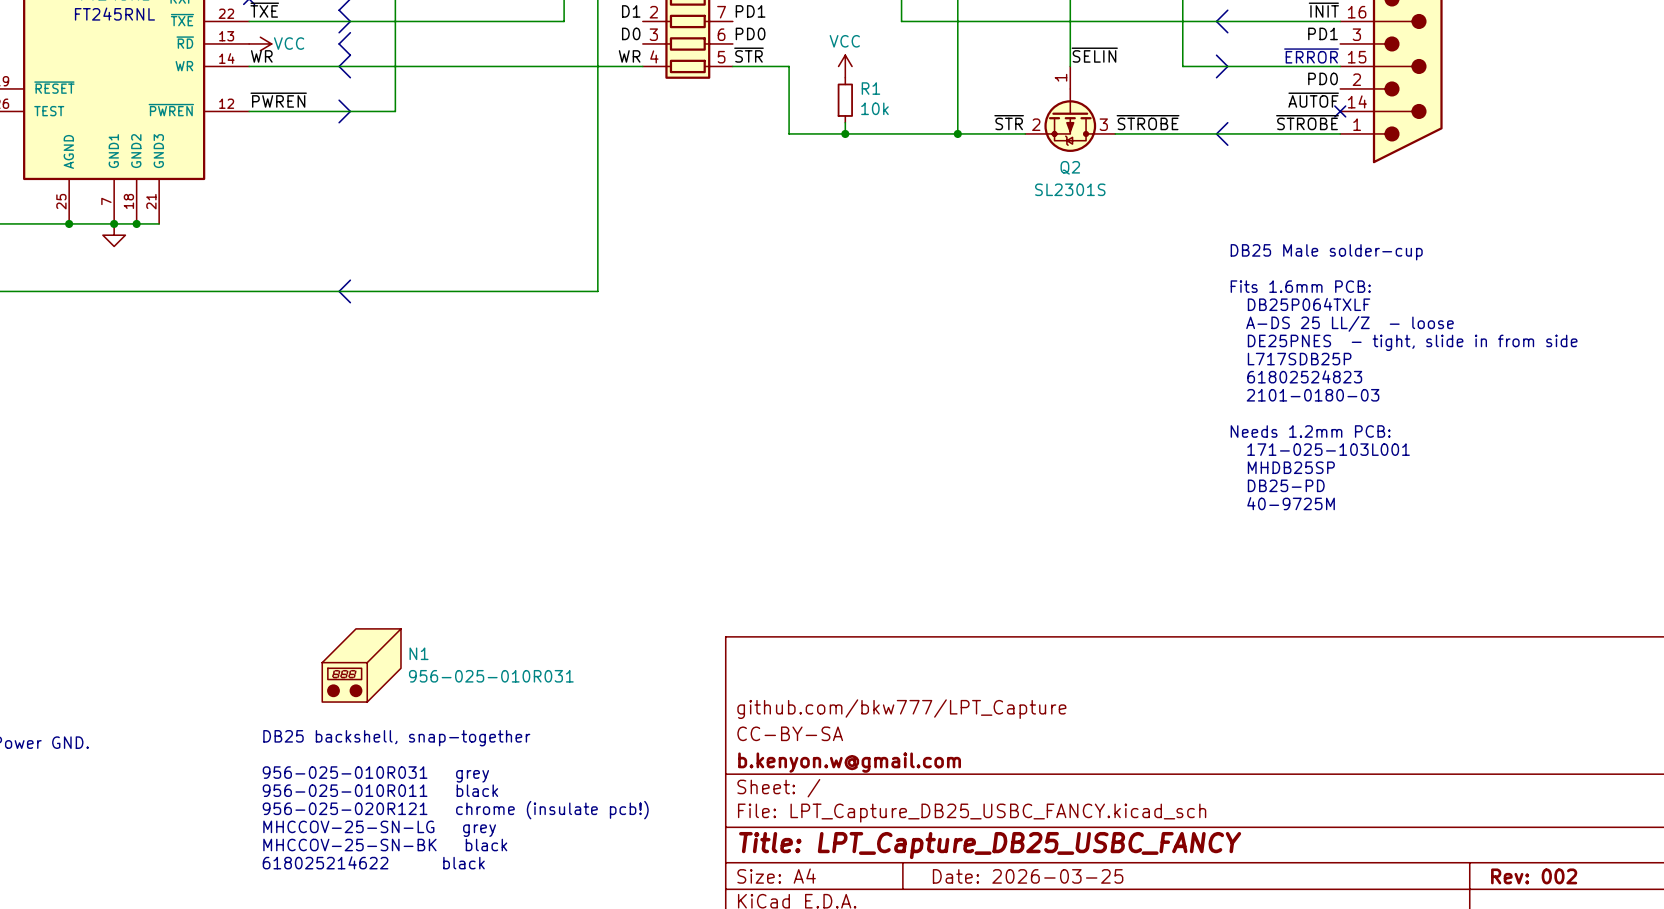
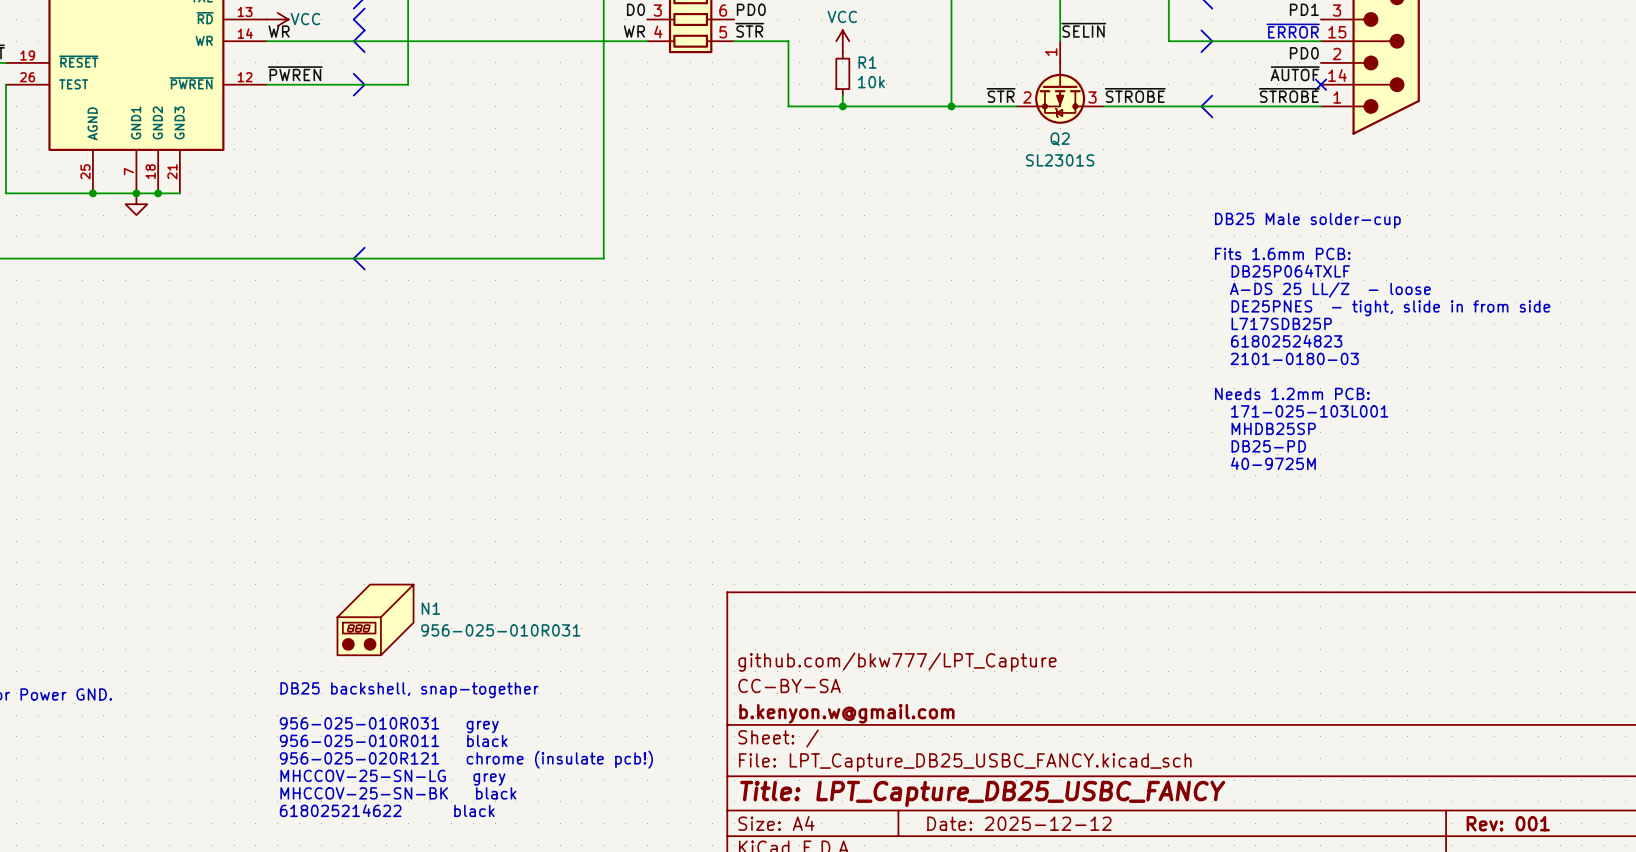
title block: Date: 2026-03-25 (1028, 876) -> Date: 2025-12-12 (1019, 823)
title block: Rev: 002 (1534, 876) -> Rev: 001 (1508, 823)

